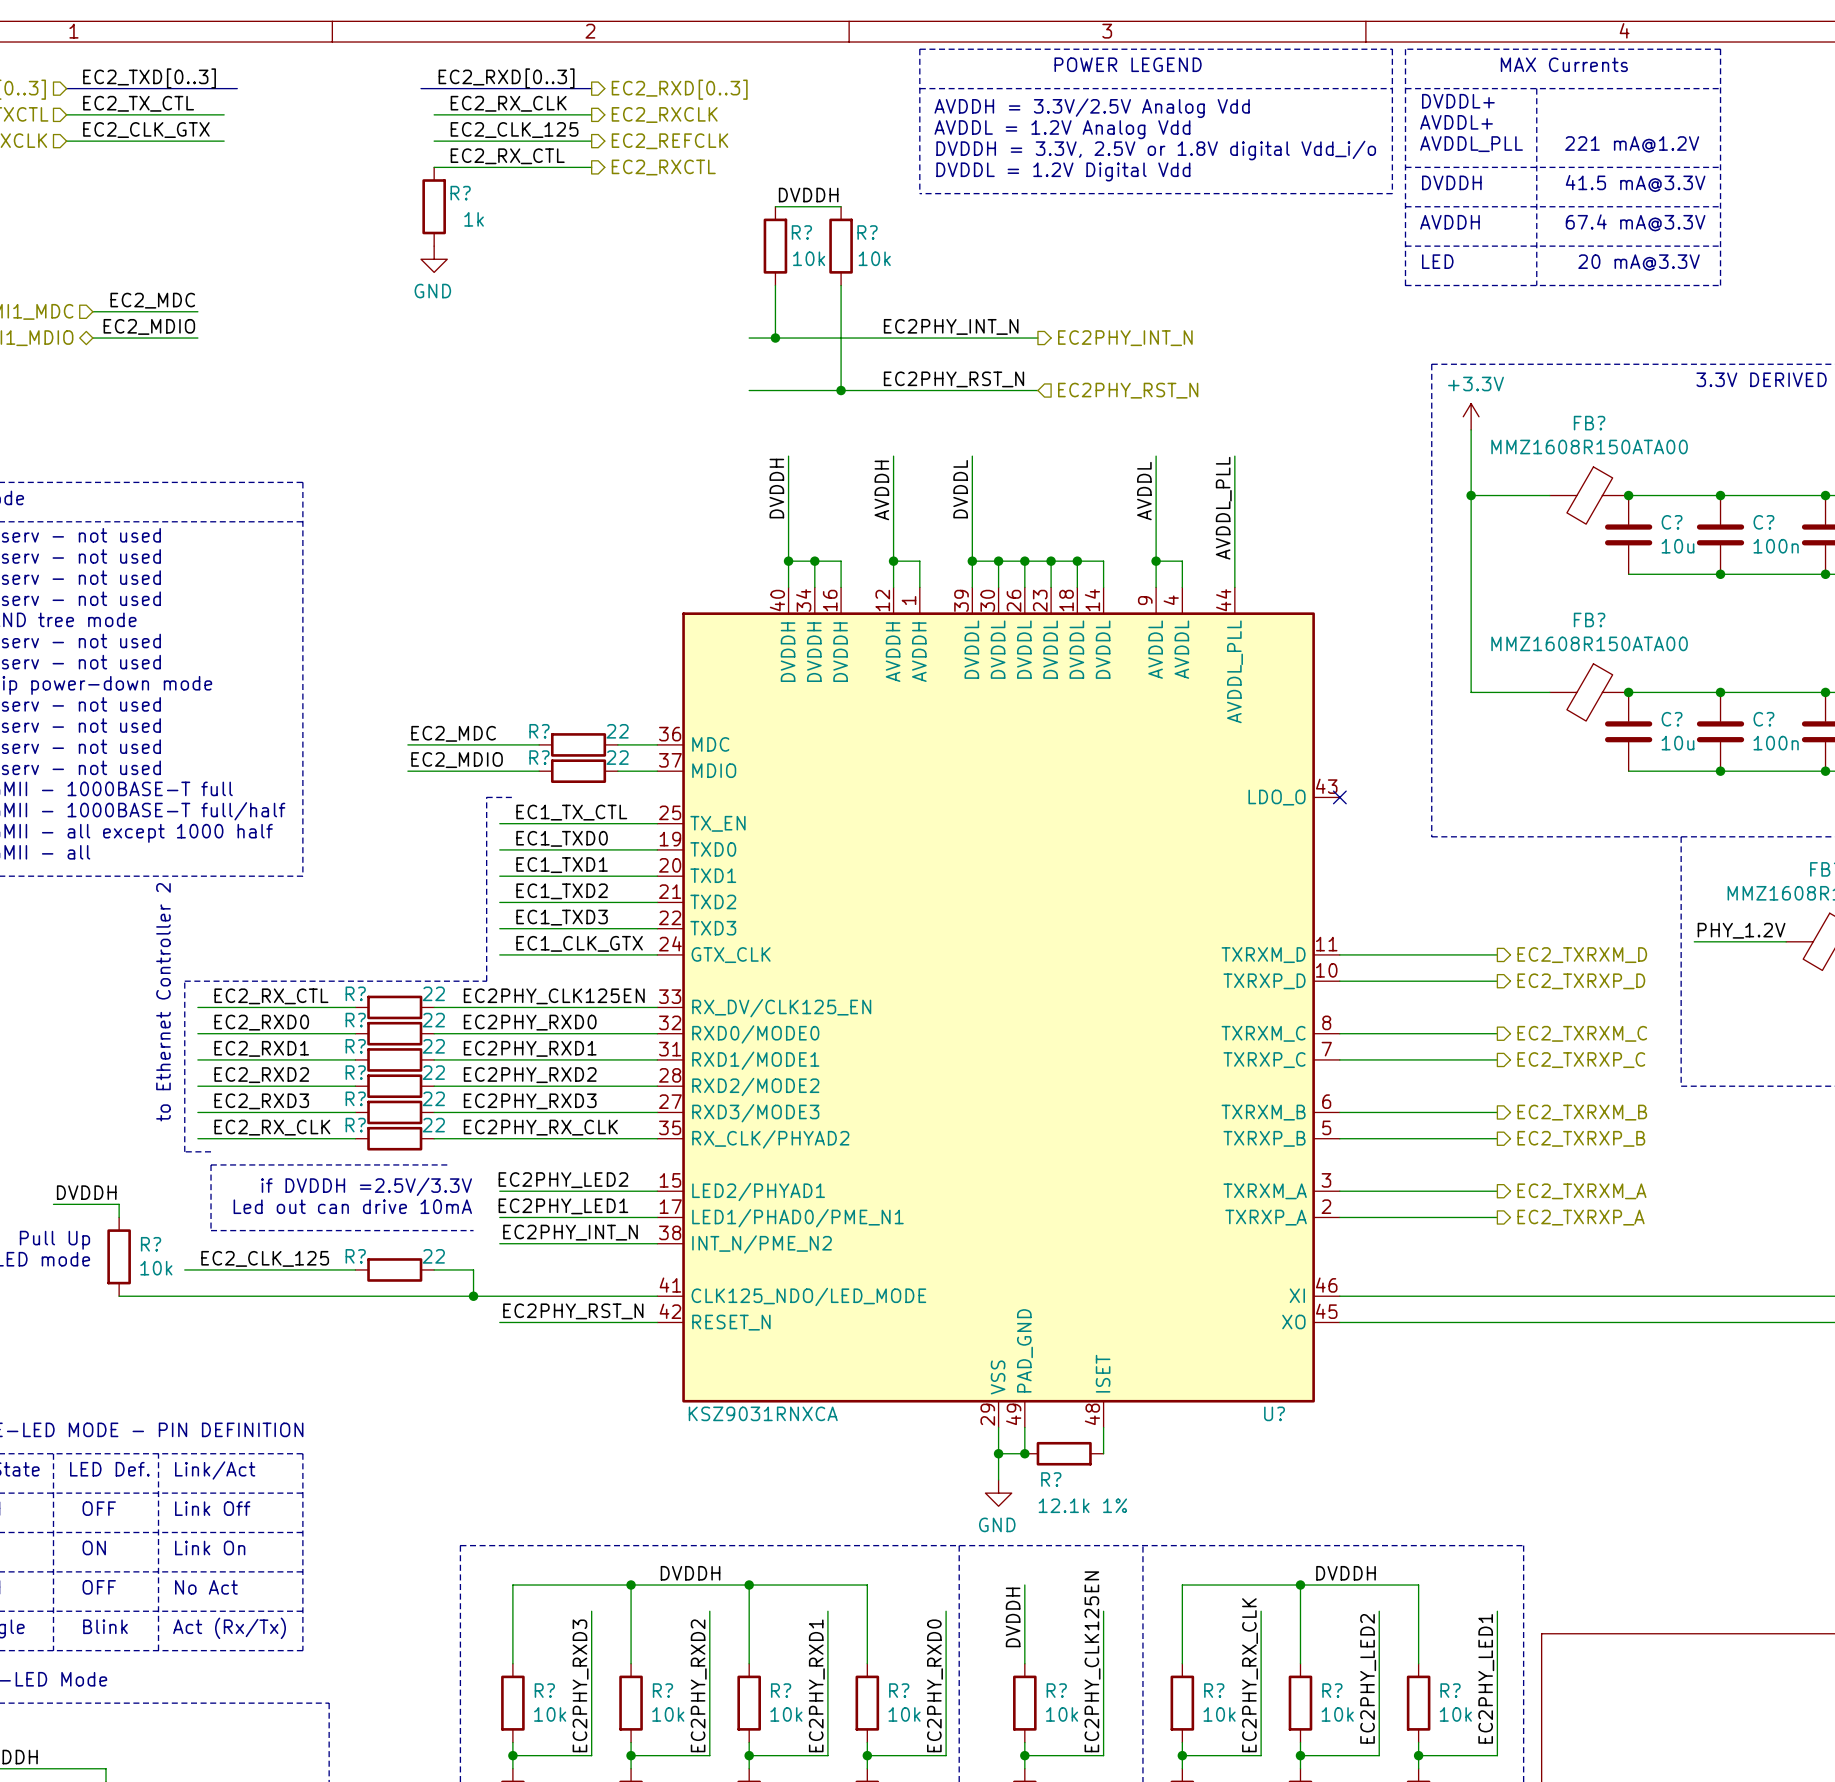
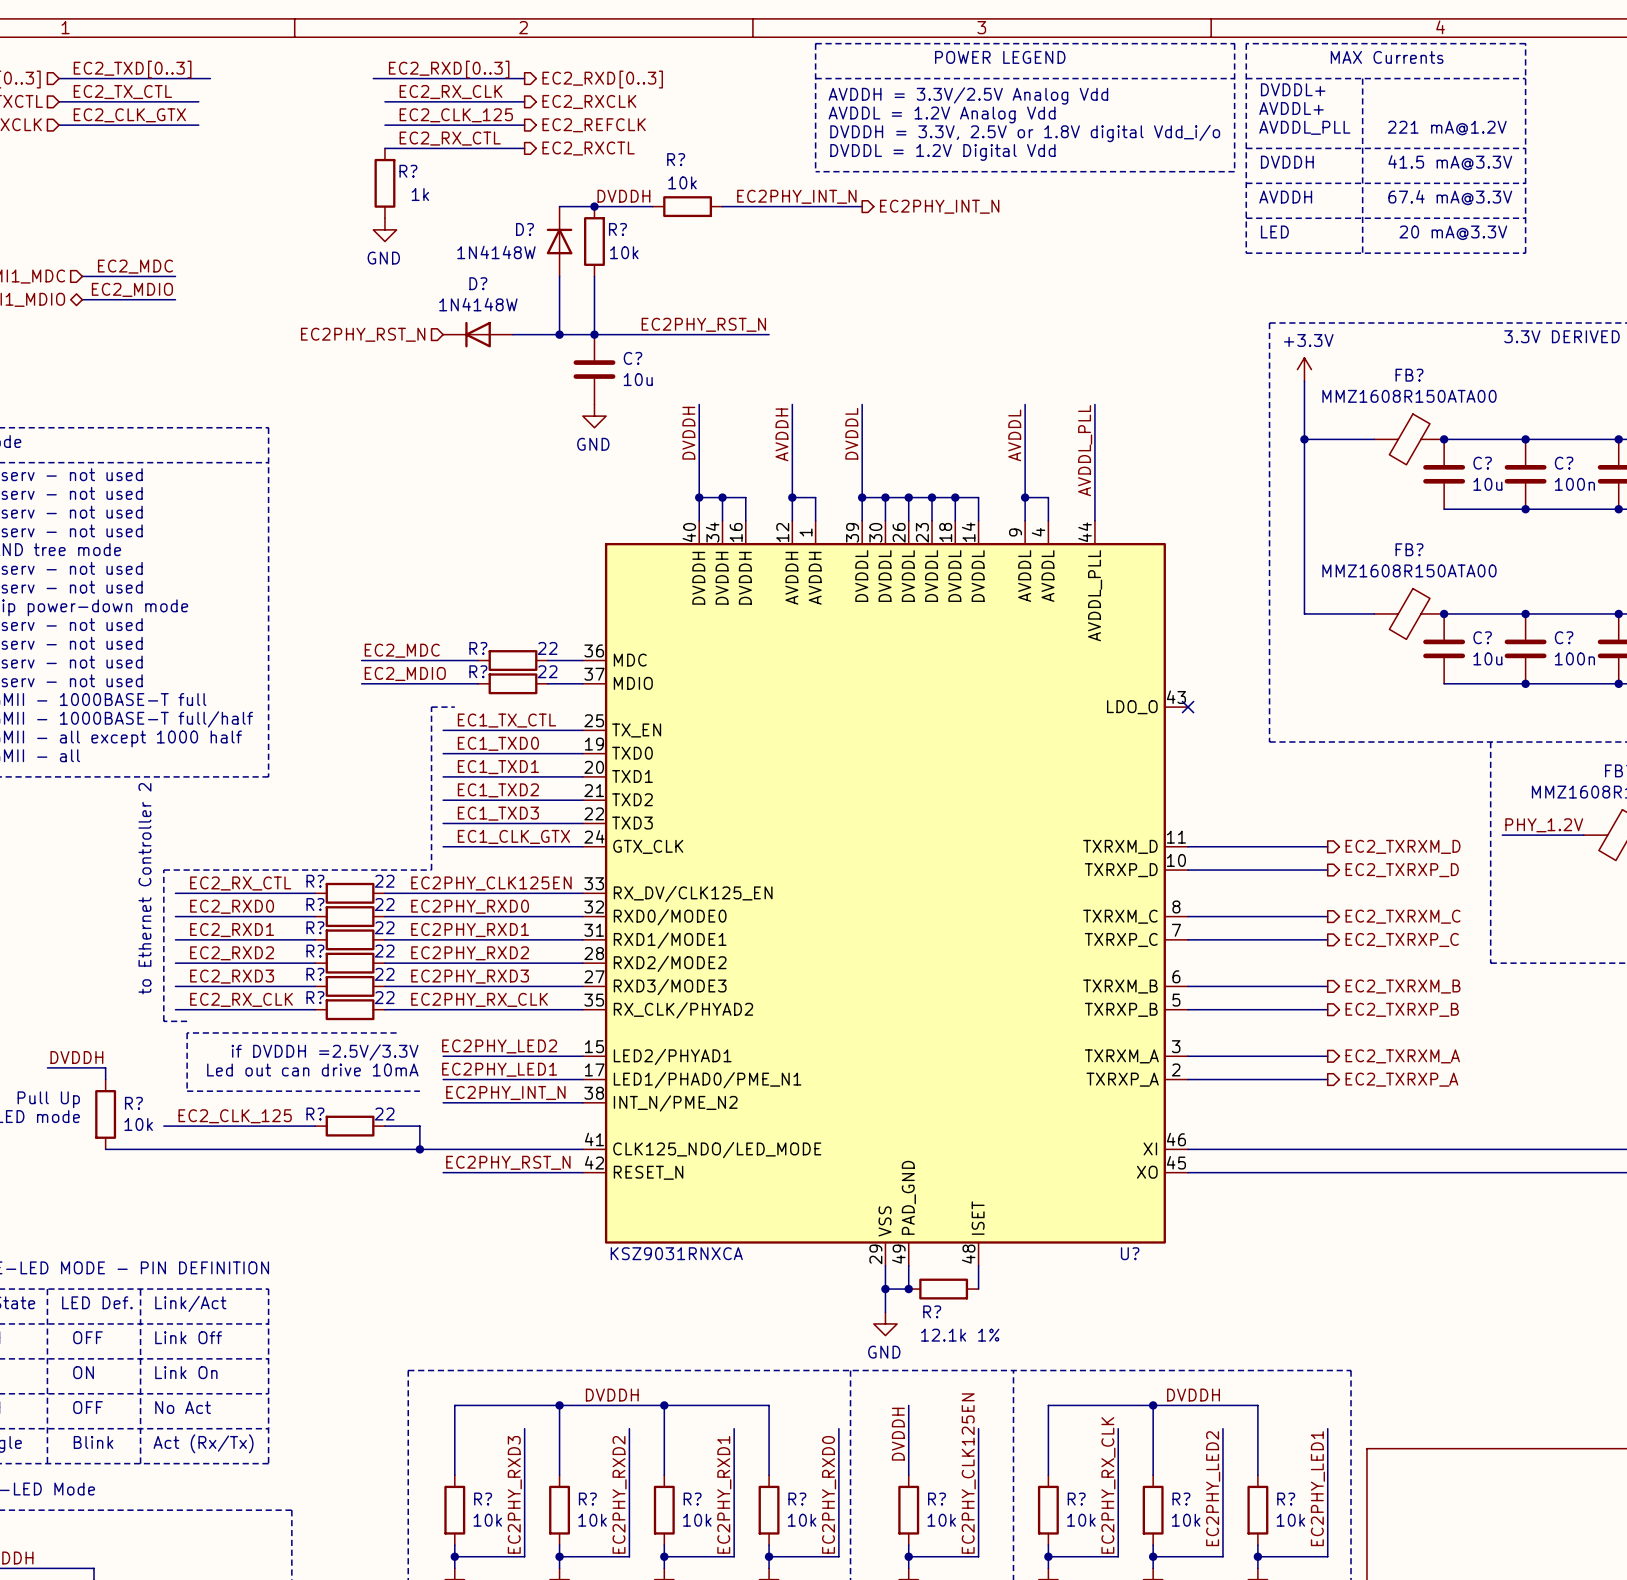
label position: DVDDH (808, 195) -> DVDDH (623, 196)
wire: (775, 206) (841, 206) -> none
R? name position: R? (801, 232) -> R? (676, 159)
wire: none -> (559, 206) (652, 206)
junction: none -> (594, 206)
wire: none -> (722, 206) (862, 206)
R? rotation: 0° (775, 246) -> 90° clockwise (687, 206)
R?: 10k (841, 246) -> none
R? value position: 10k (809, 258) -> 10k (682, 182)
D?: none -> 1N4148W (559, 241)
R?: none -> 10k (594, 241)
wire: (775, 285) (775, 338) -> none
wire: (841, 285) (841, 390) -> none
wire: none -> (559, 276) (559, 334)
wire: none -> (594, 276) (594, 334)
label position: EC2PHY_INT_N (951, 326) -> EC2PHY_INT_N (796, 196)
wire: (749, 338) (1037, 338) -> none
junction: (775, 338) -> none
hierarchical label position: EC2PHY_INT_N (1125, 338) -> EC2PHY_INT_N (939, 206)
hierarchical label: none -> EC2PHY_RST_N (363, 334)
D?: none -> 1N4148W (478, 334)
junction: none -> (559, 334)
junction: none -> (594, 334)
label position: EC2PHY_RST_N (953, 379) -> EC2PHY_RST_N (703, 324)
wire: (749, 390) (1037, 390) -> (513, 334) (769, 334)
junction: (841, 390) -> none
hierarchical label: EC2PHY_RST_N (1128, 390) -> none
C?: none -> 10u (594, 369)
power symbol: none -> GND (594, 416)

